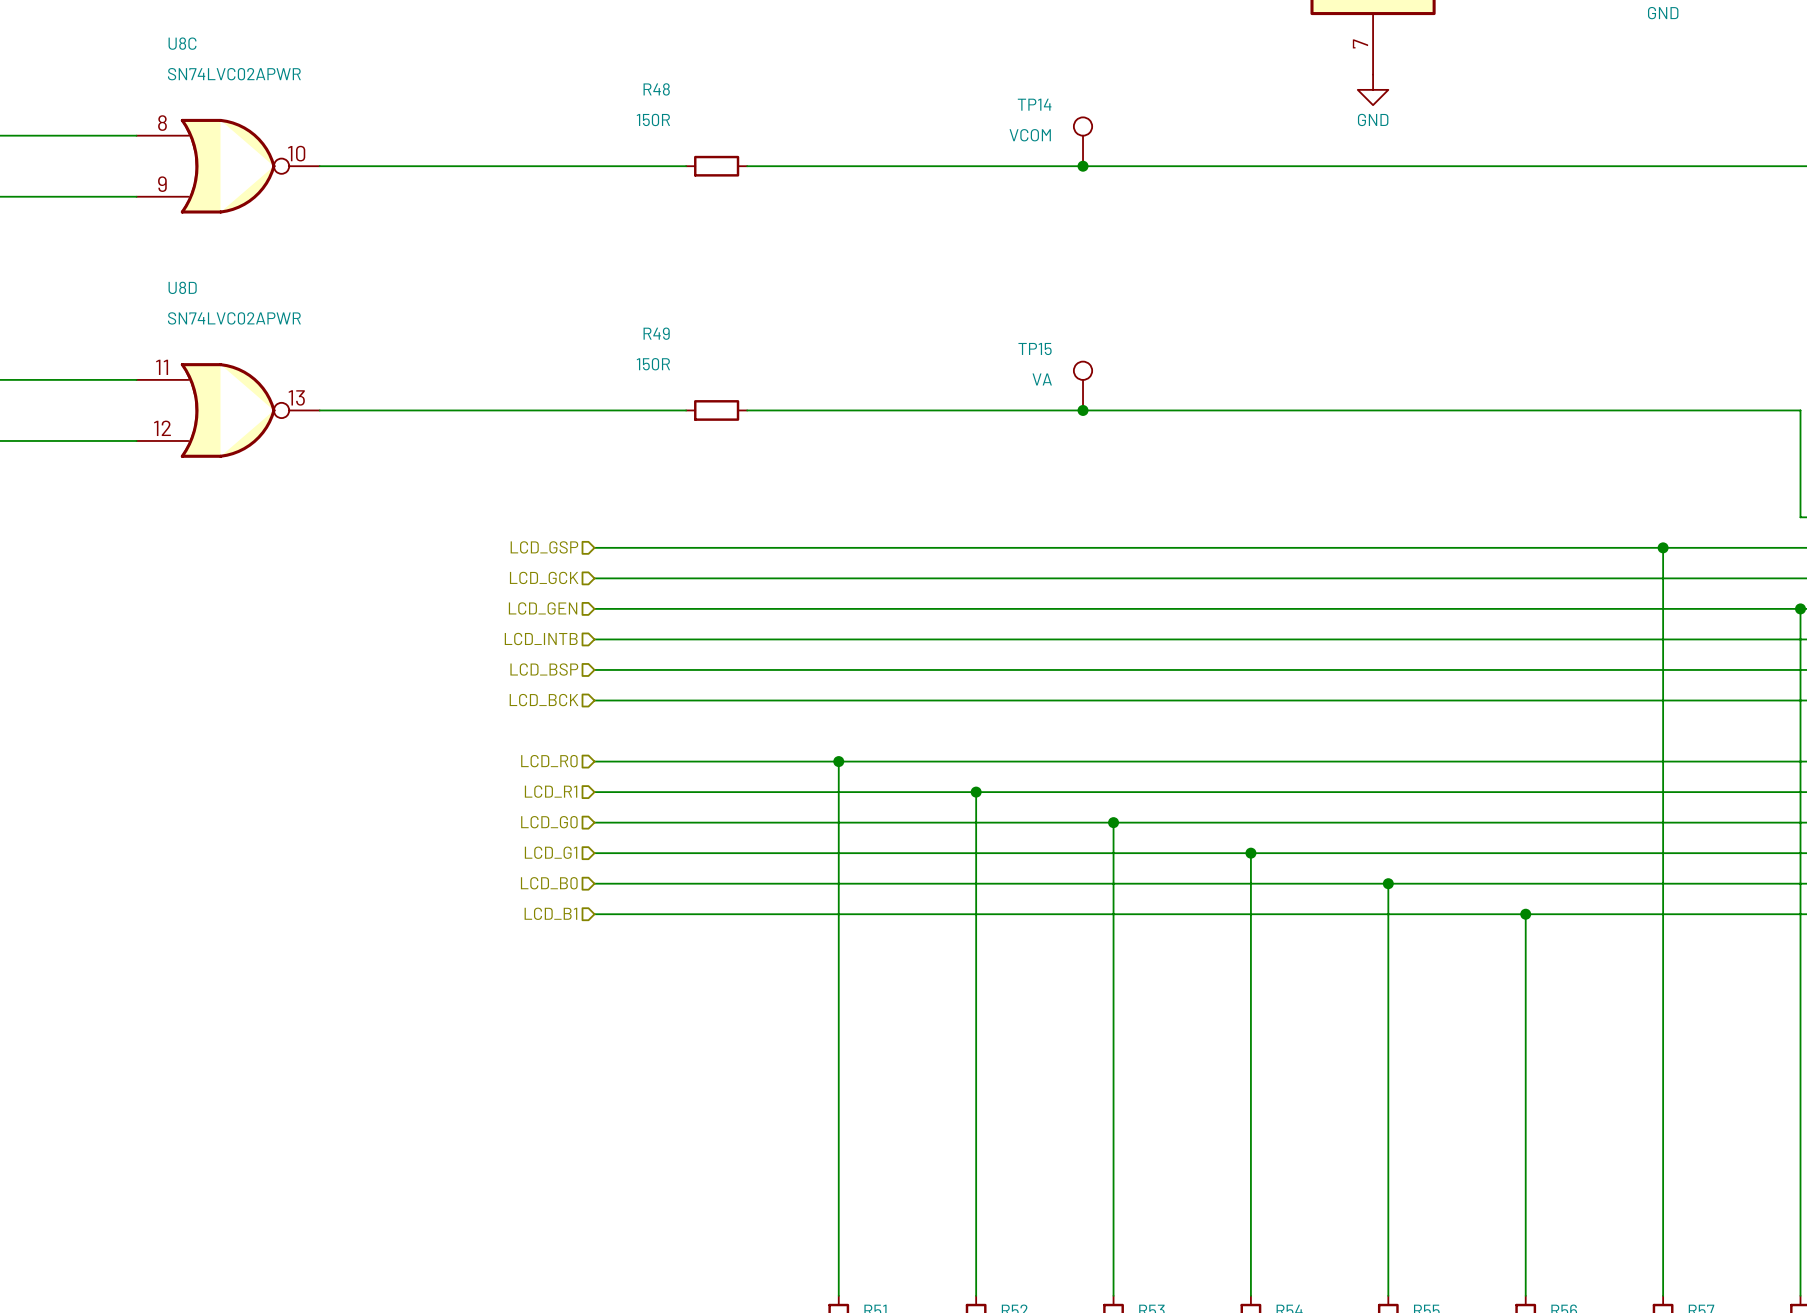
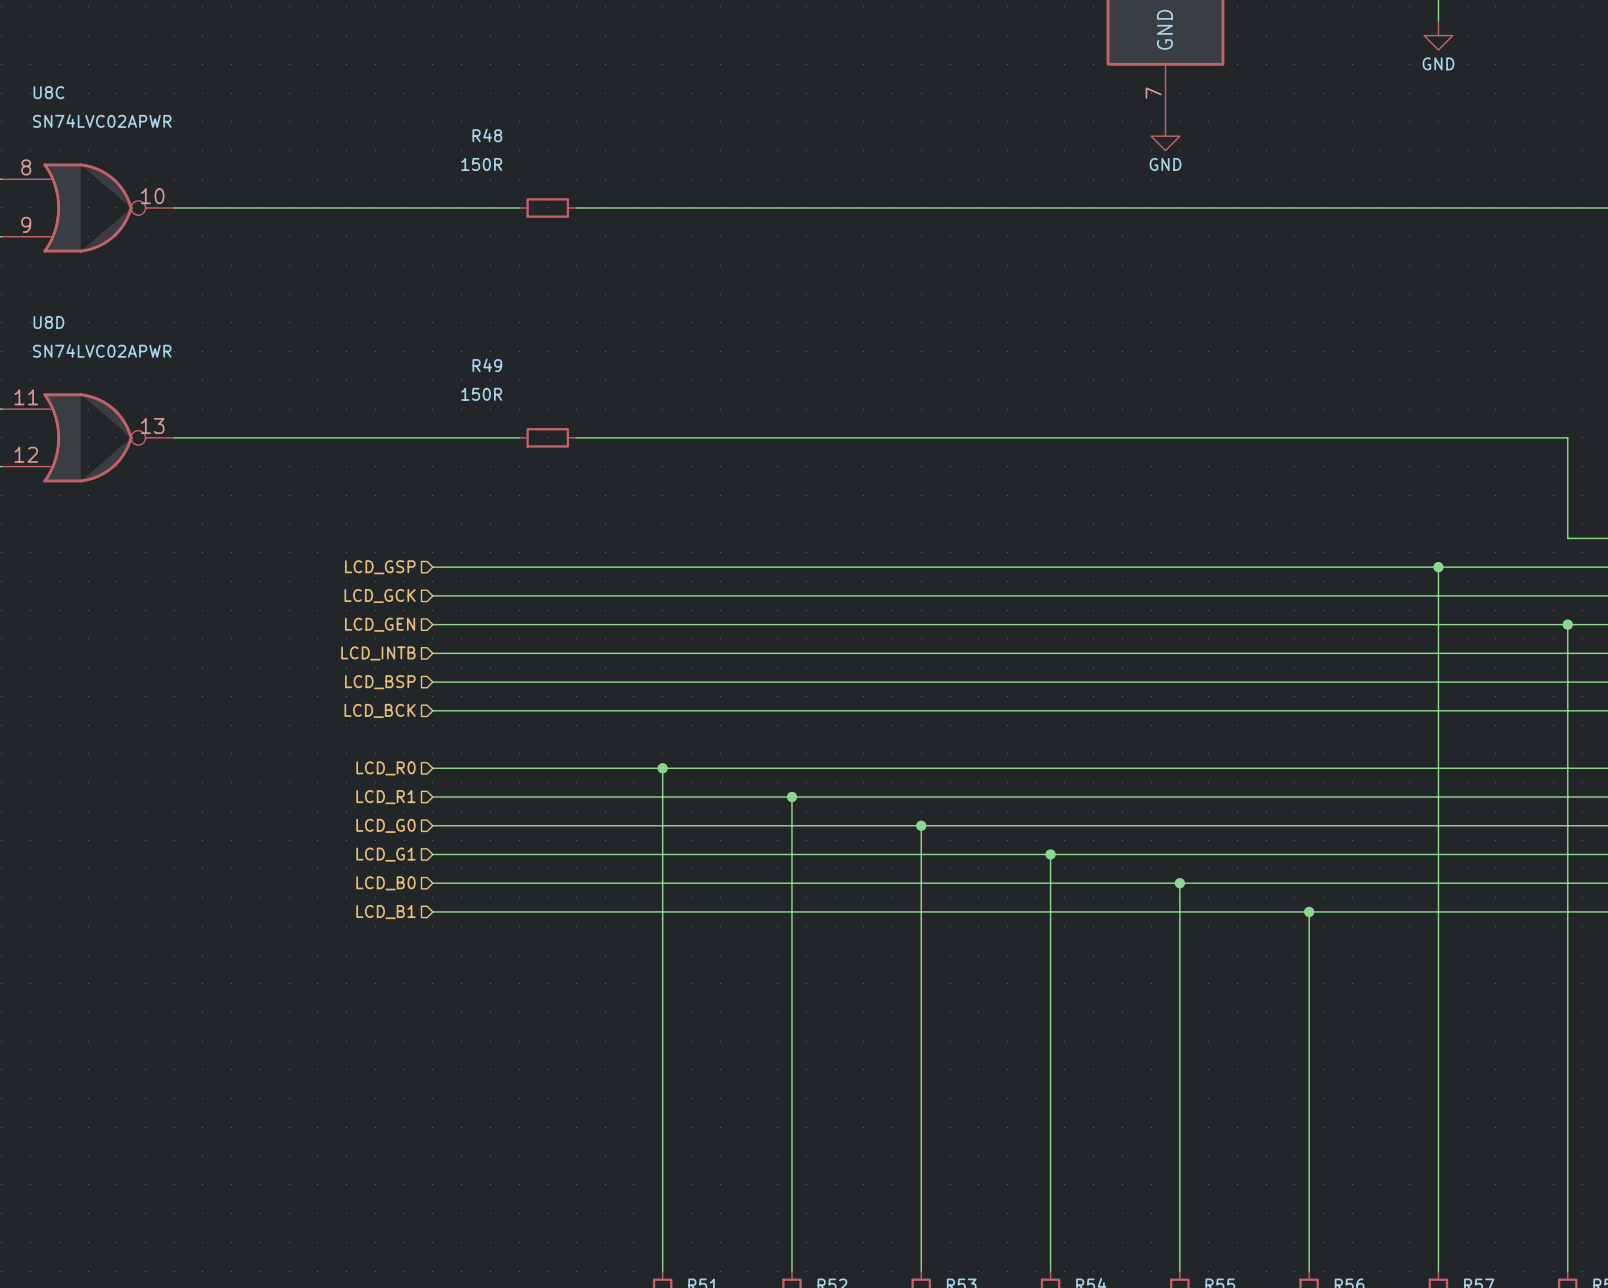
TP14: VCOM (1083, 141) -> none
junction: (1083, 166) -> none
TP15: VA (1083, 386) -> none
junction: (1083, 410) -> none

